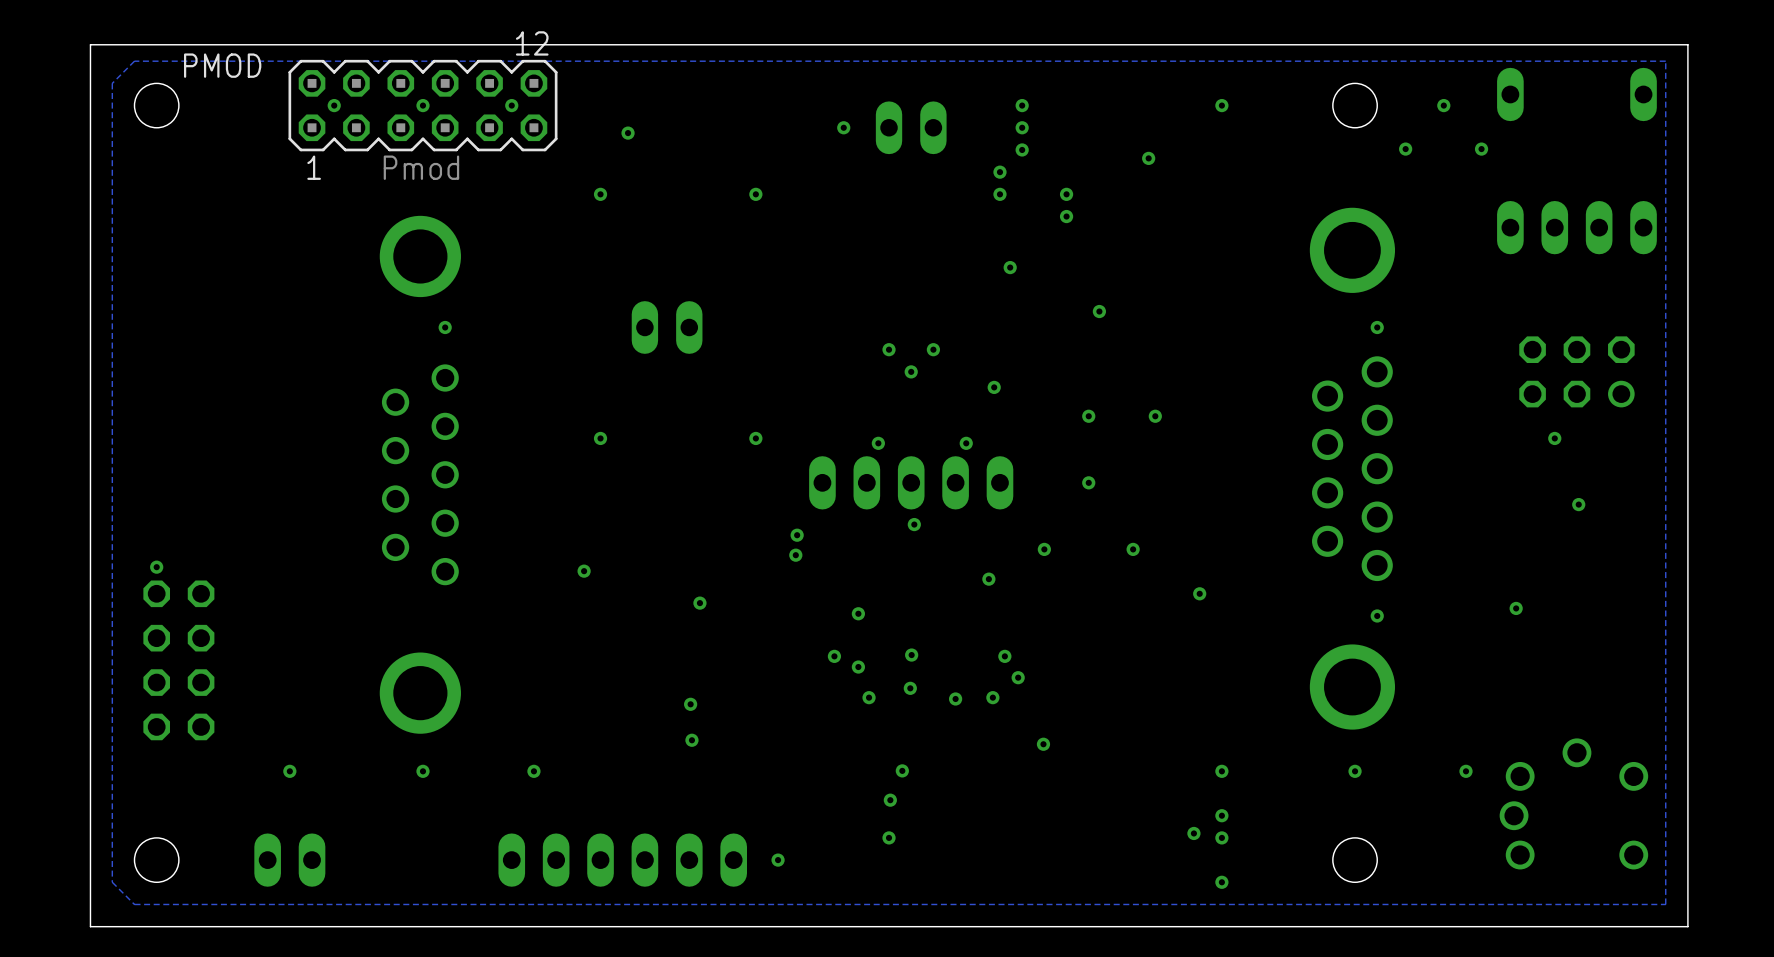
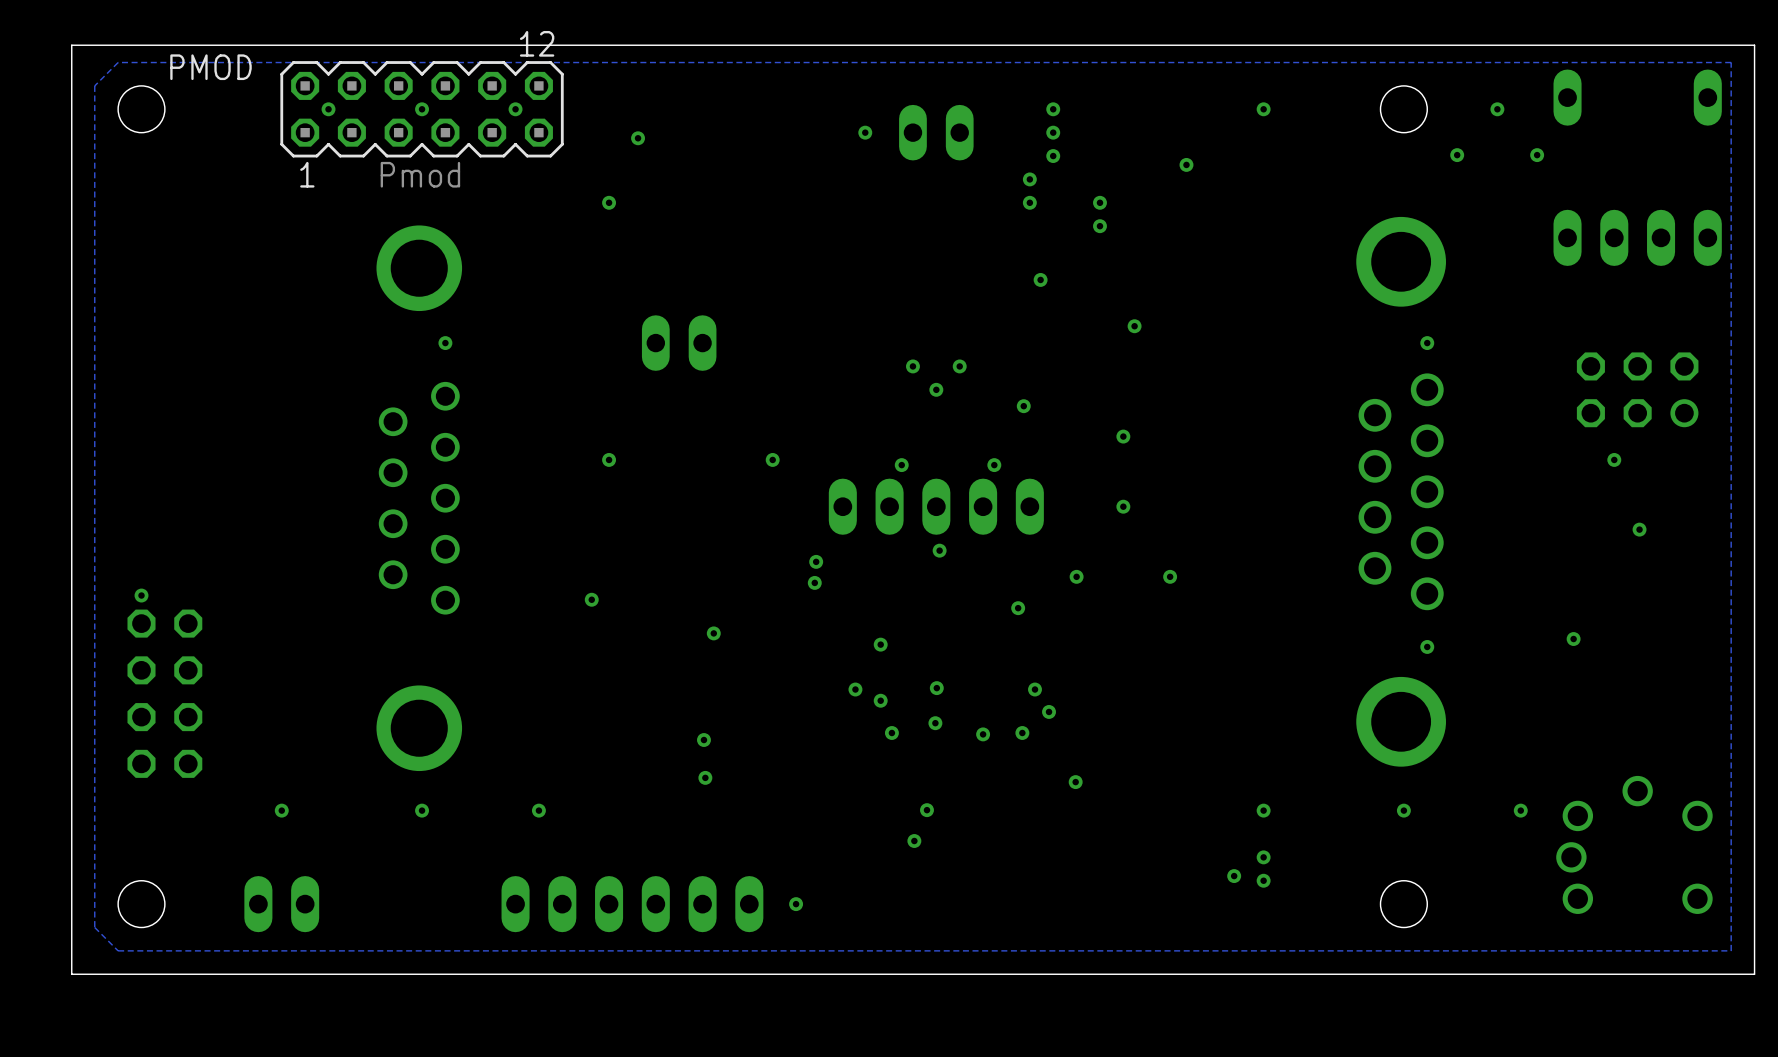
via: (755, 194) -> none
via: (1155, 416) -> none
via: (1199, 593) -> none
via: (889, 837) -> none
via: (1221, 882) -> none

